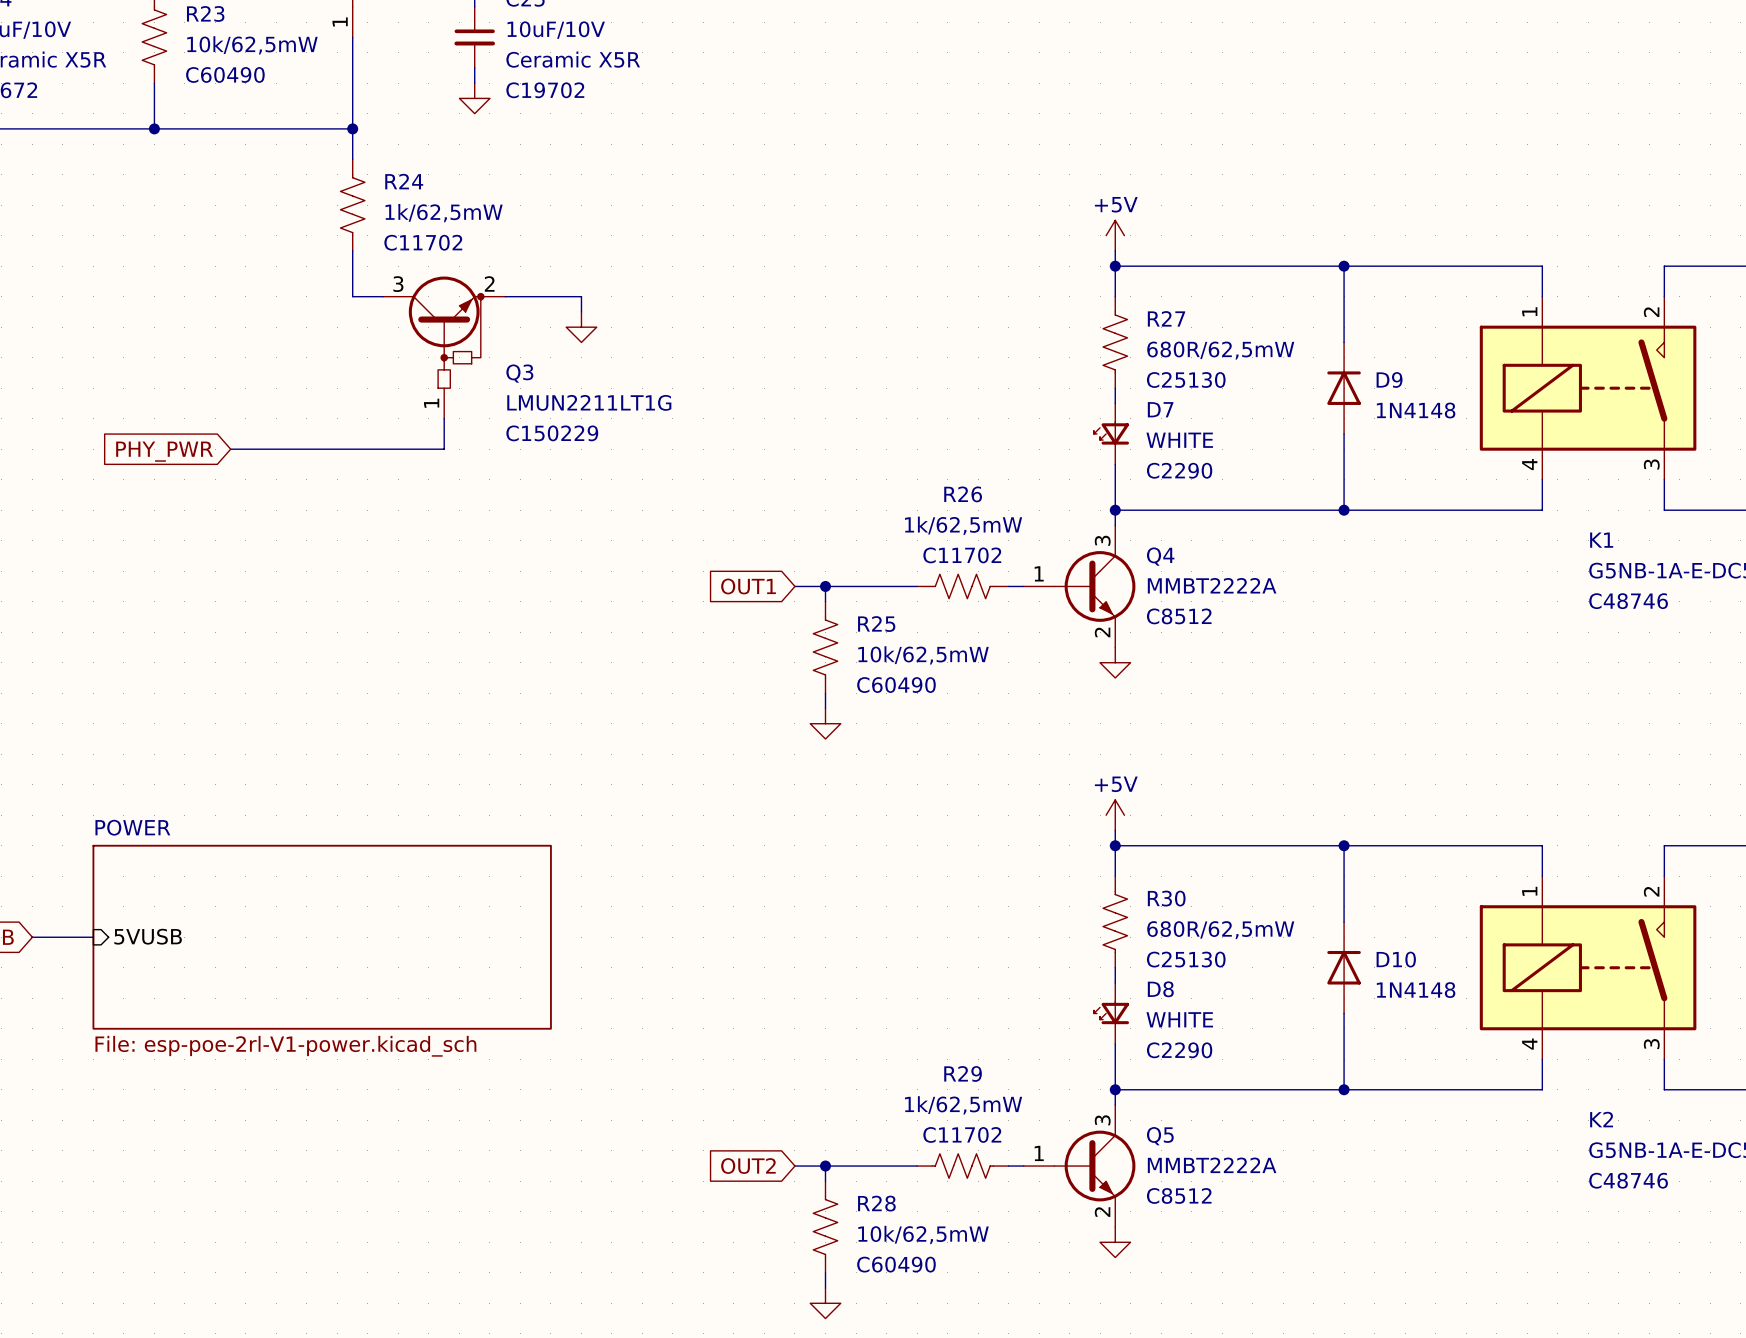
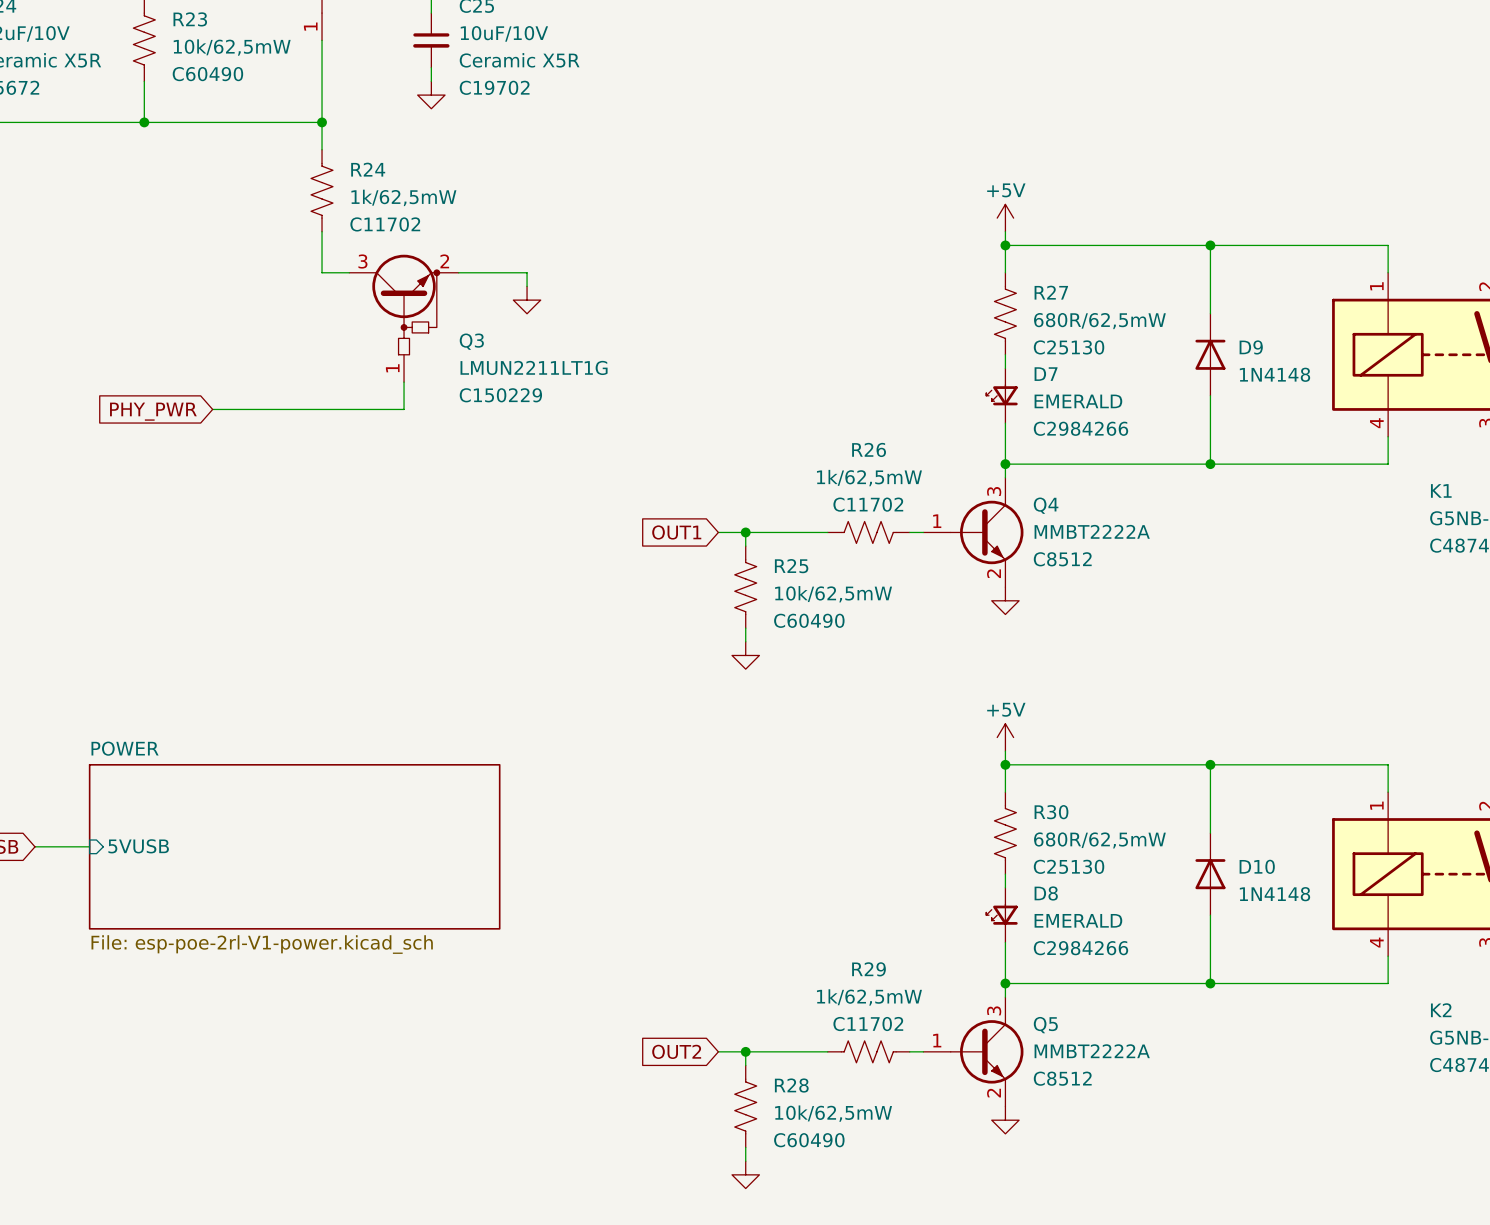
D7 value: WHITE (1179, 440) -> EMERALD (1078, 401)
D7 text: C2290 (1179, 470) -> C2984266 (1080, 428)
D8 value: WHITE (1179, 1019) -> EMERALD (1078, 920)
D8 text: C2290 (1179, 1050) -> C2984266 (1080, 948)

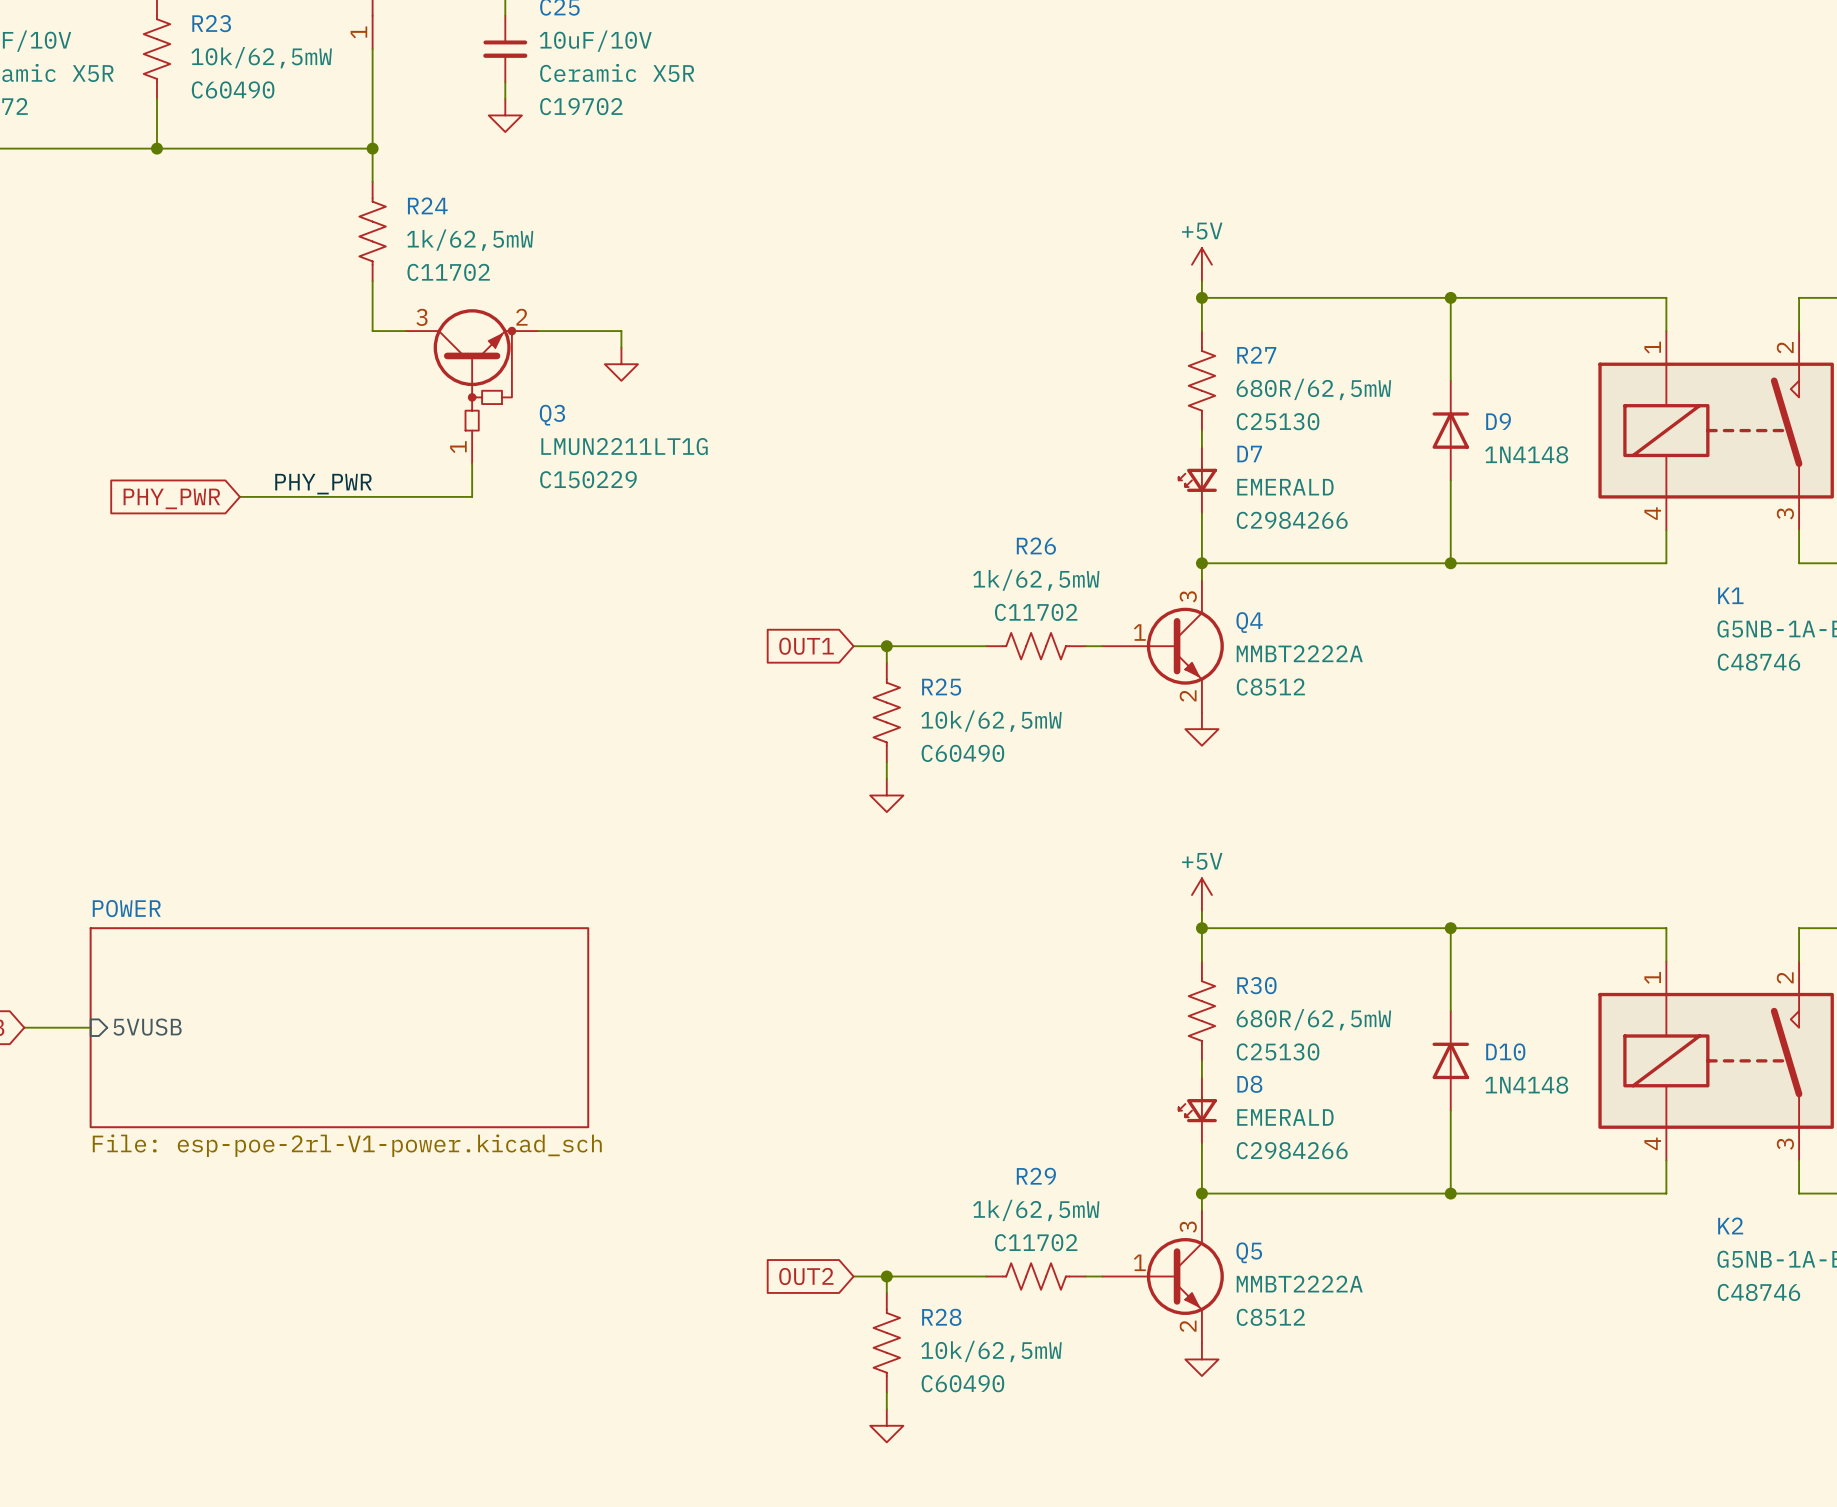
label: none -> PHY_PWR (323, 484)
Q4 symbol: [923, 477, 1024, 588] -> [1102, 579, 1224, 713]
Q5 symbol: [923, 997, 1024, 1107] -> [1102, 1210, 1224, 1343]

